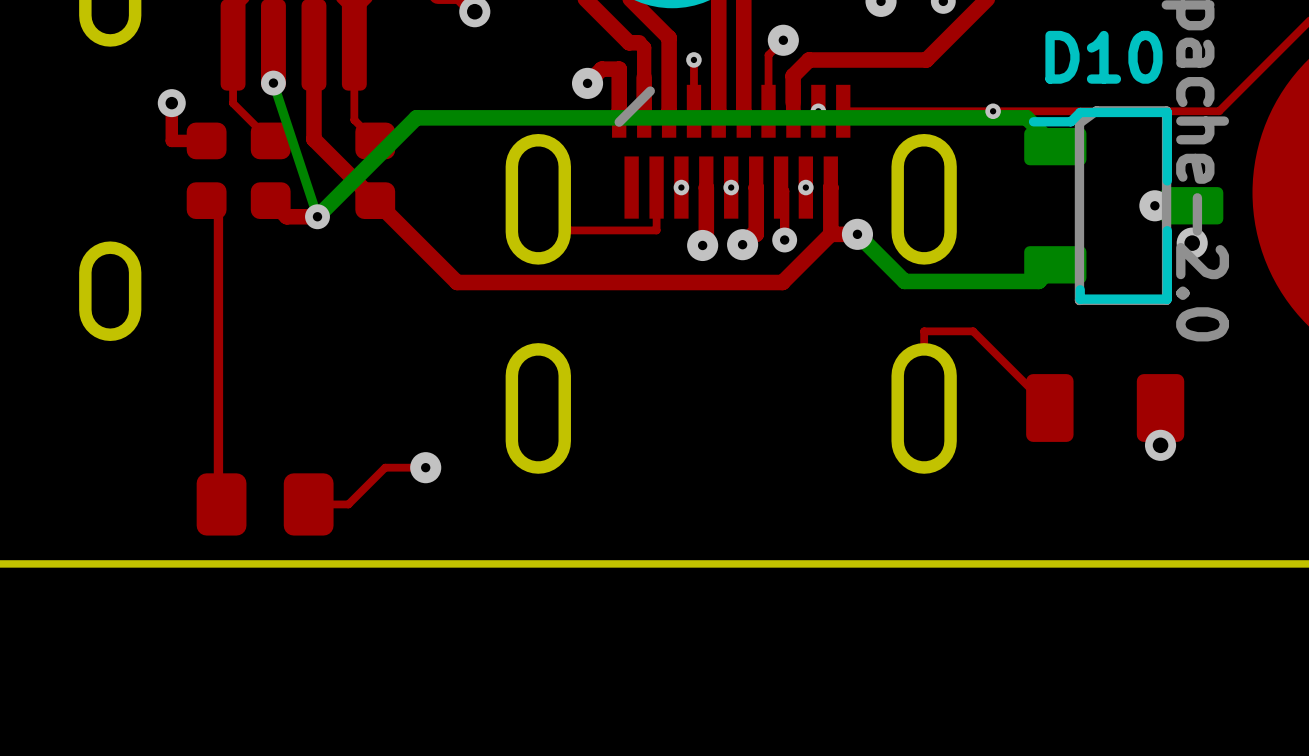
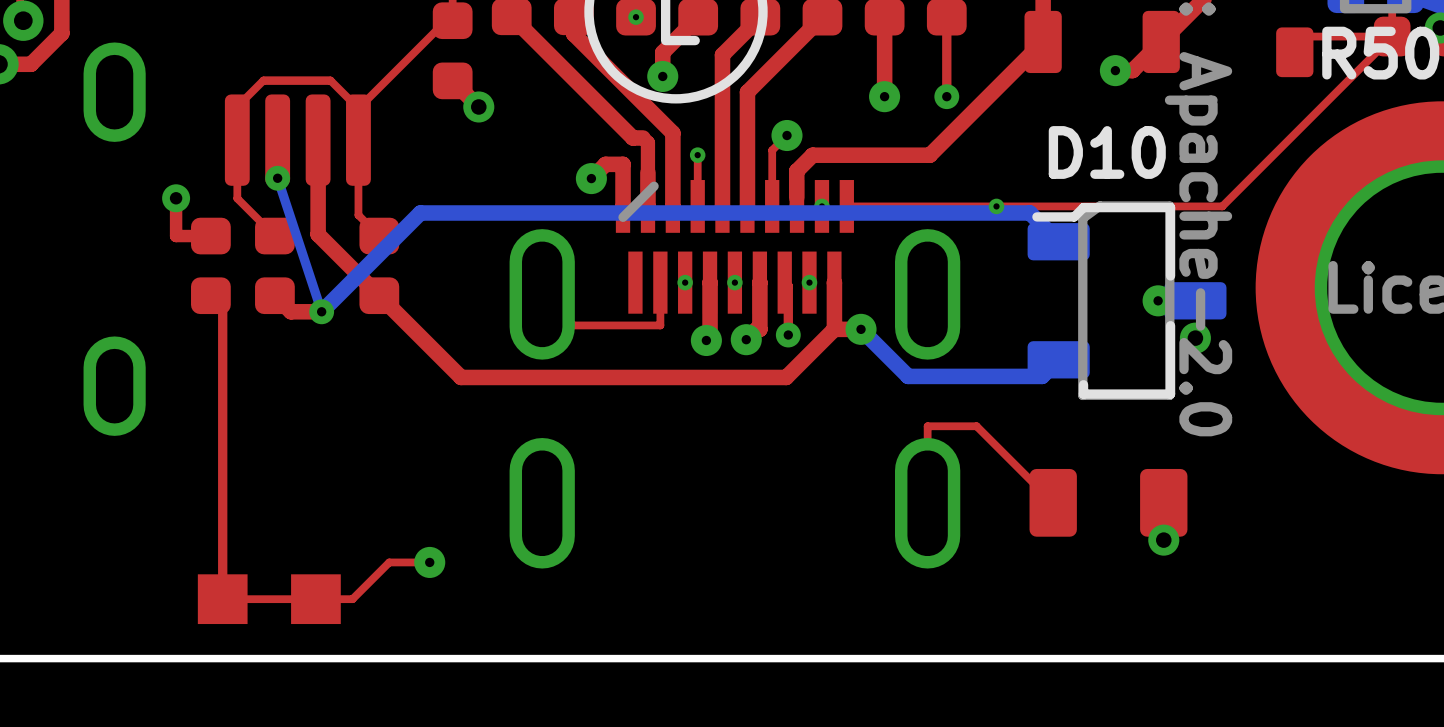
part footprint: [196, 473, 334, 536] -> [197, 574, 341, 625]
top track: none -> (315, 599) (222, 599)

